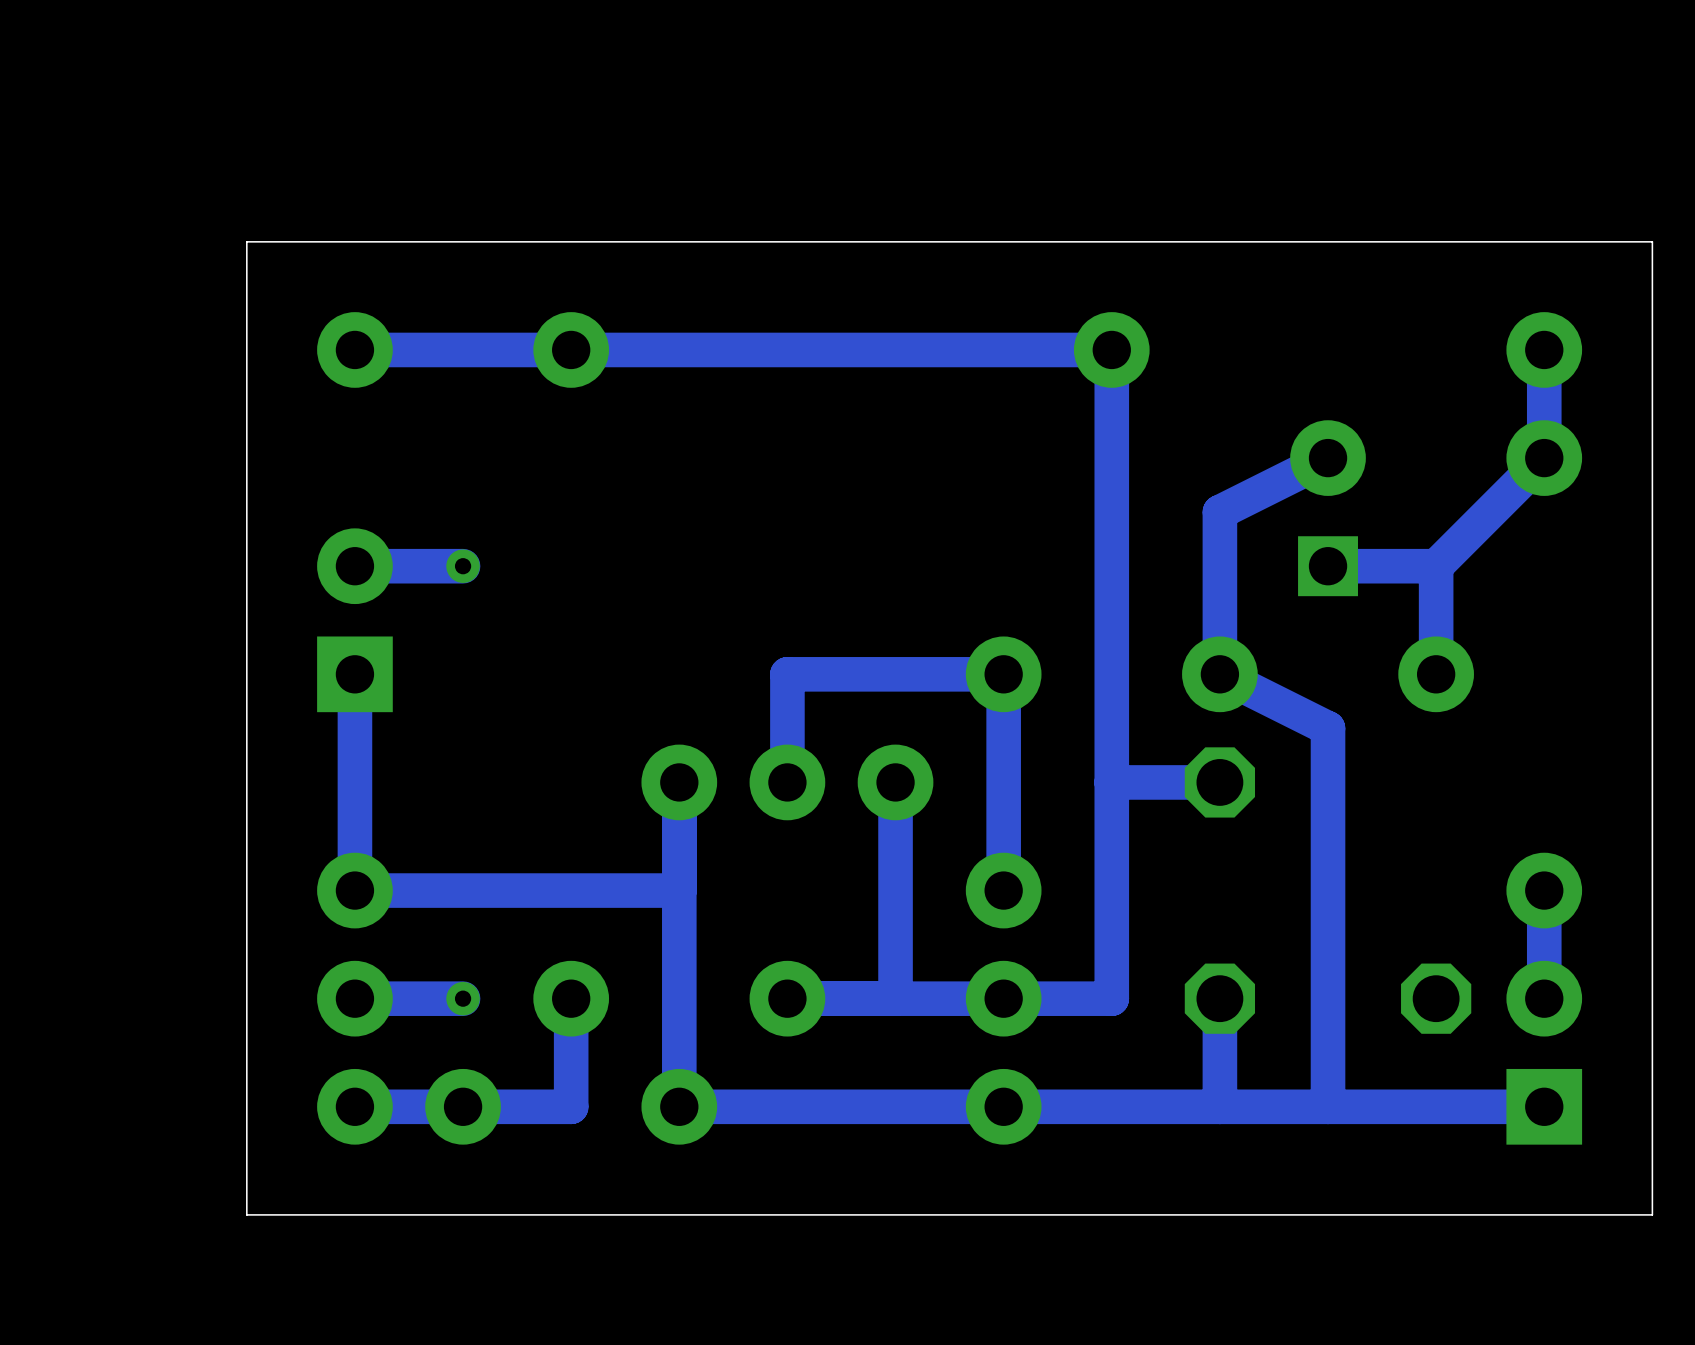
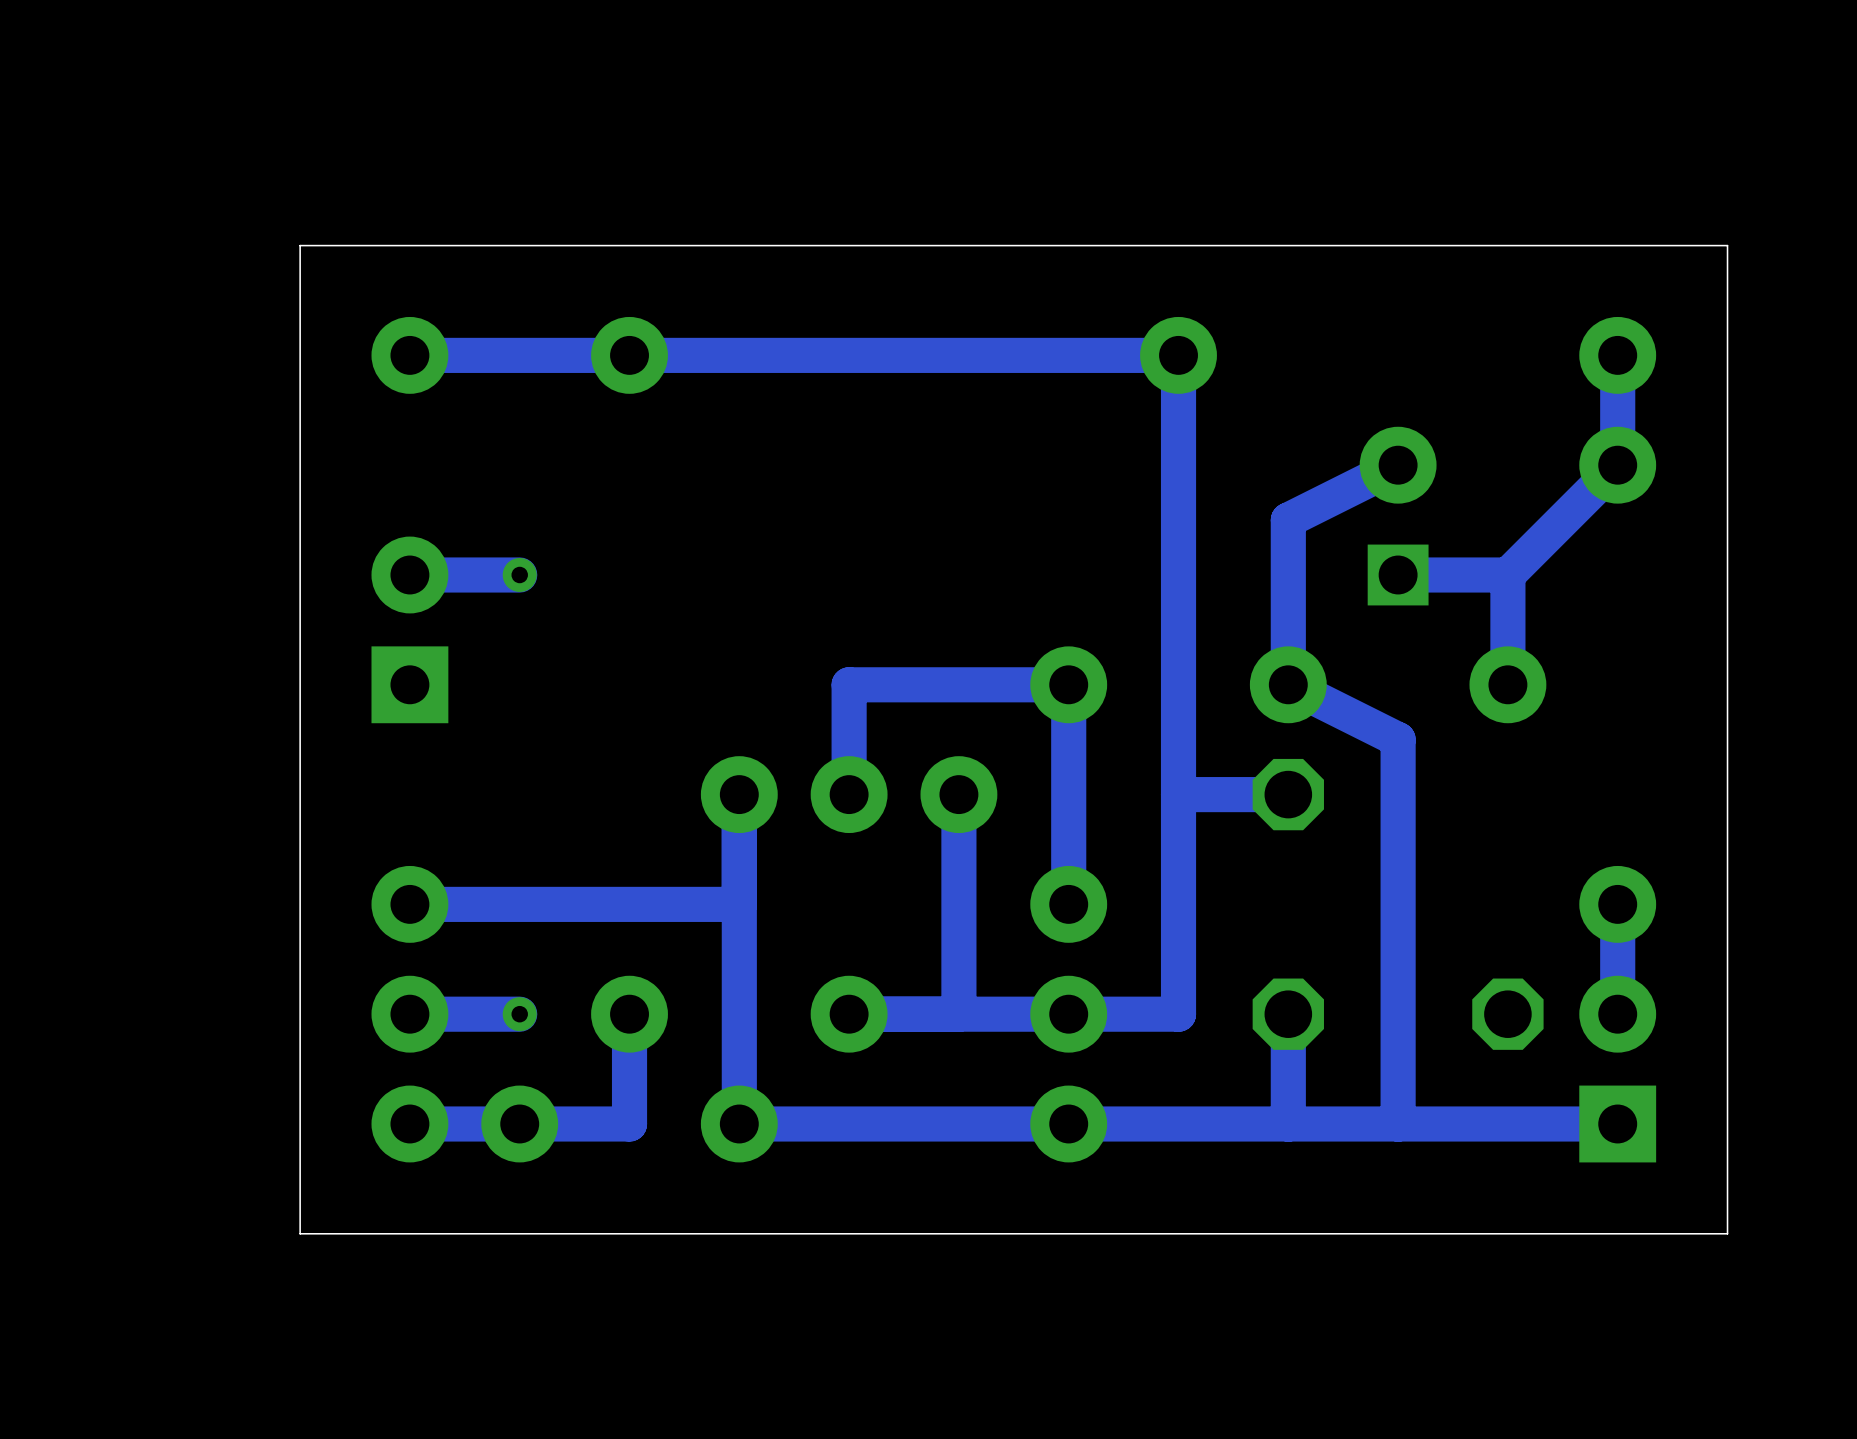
track: (354, 674) (354, 890) -> none

